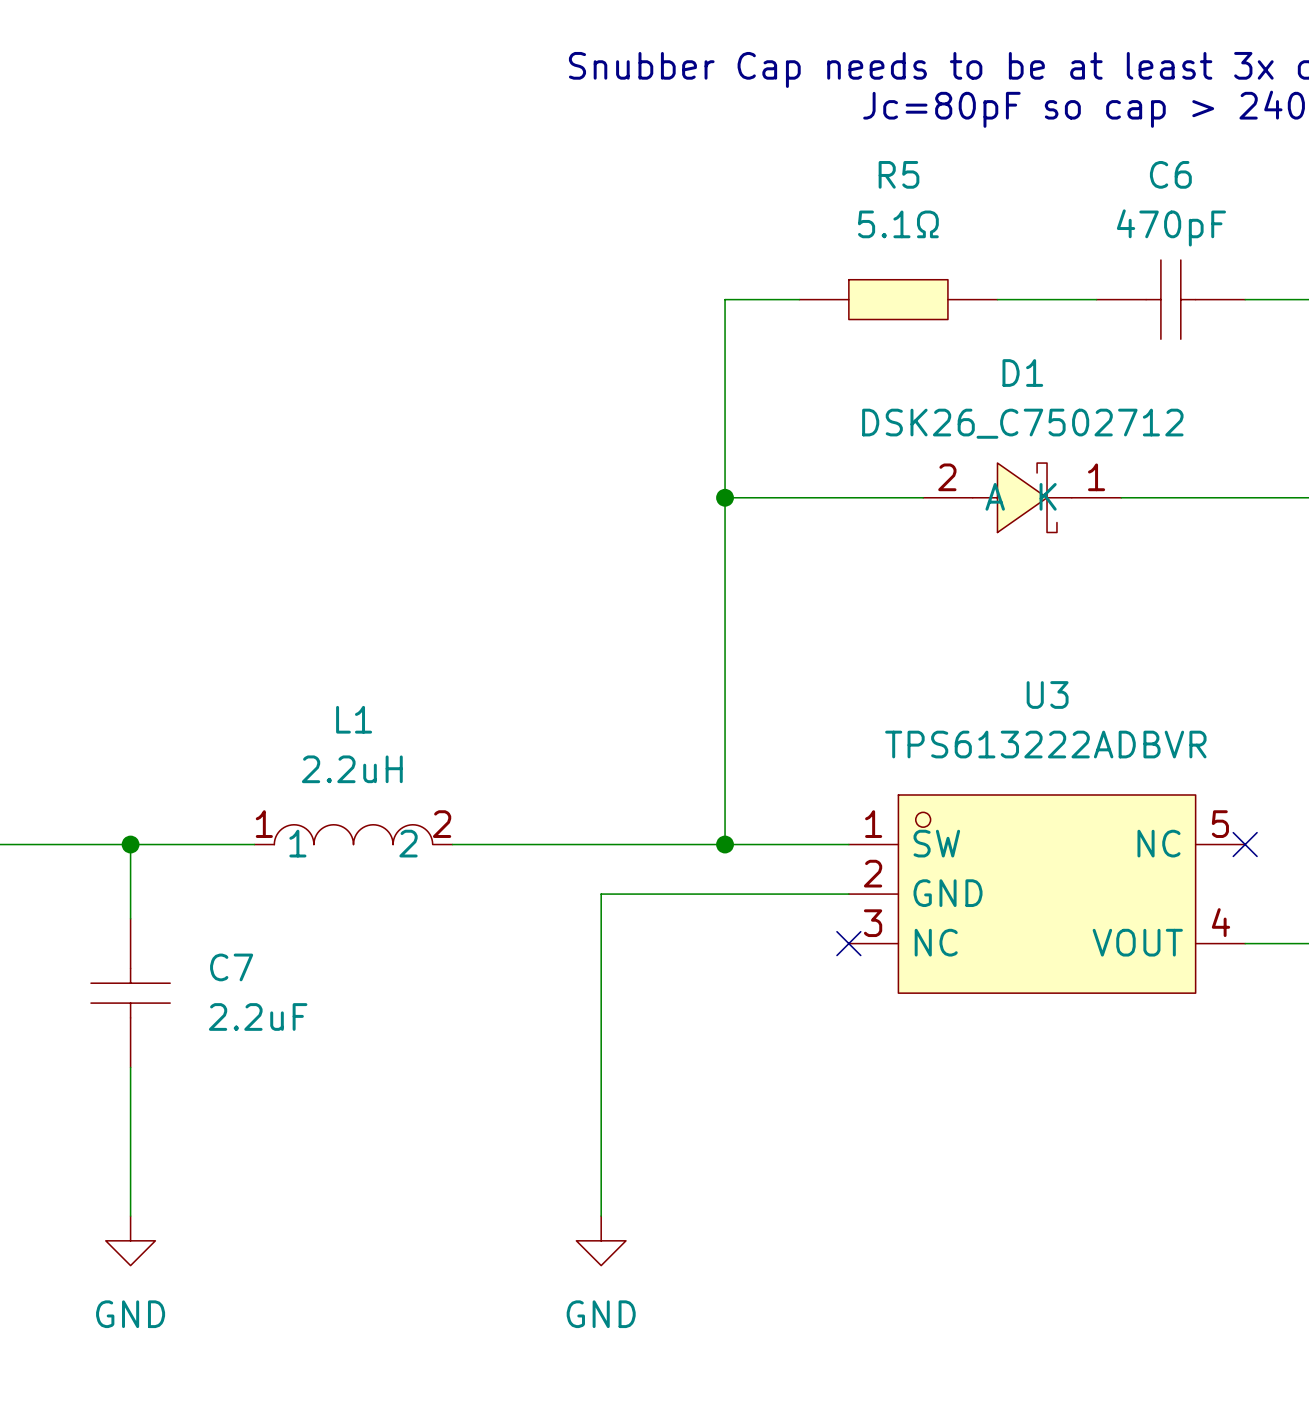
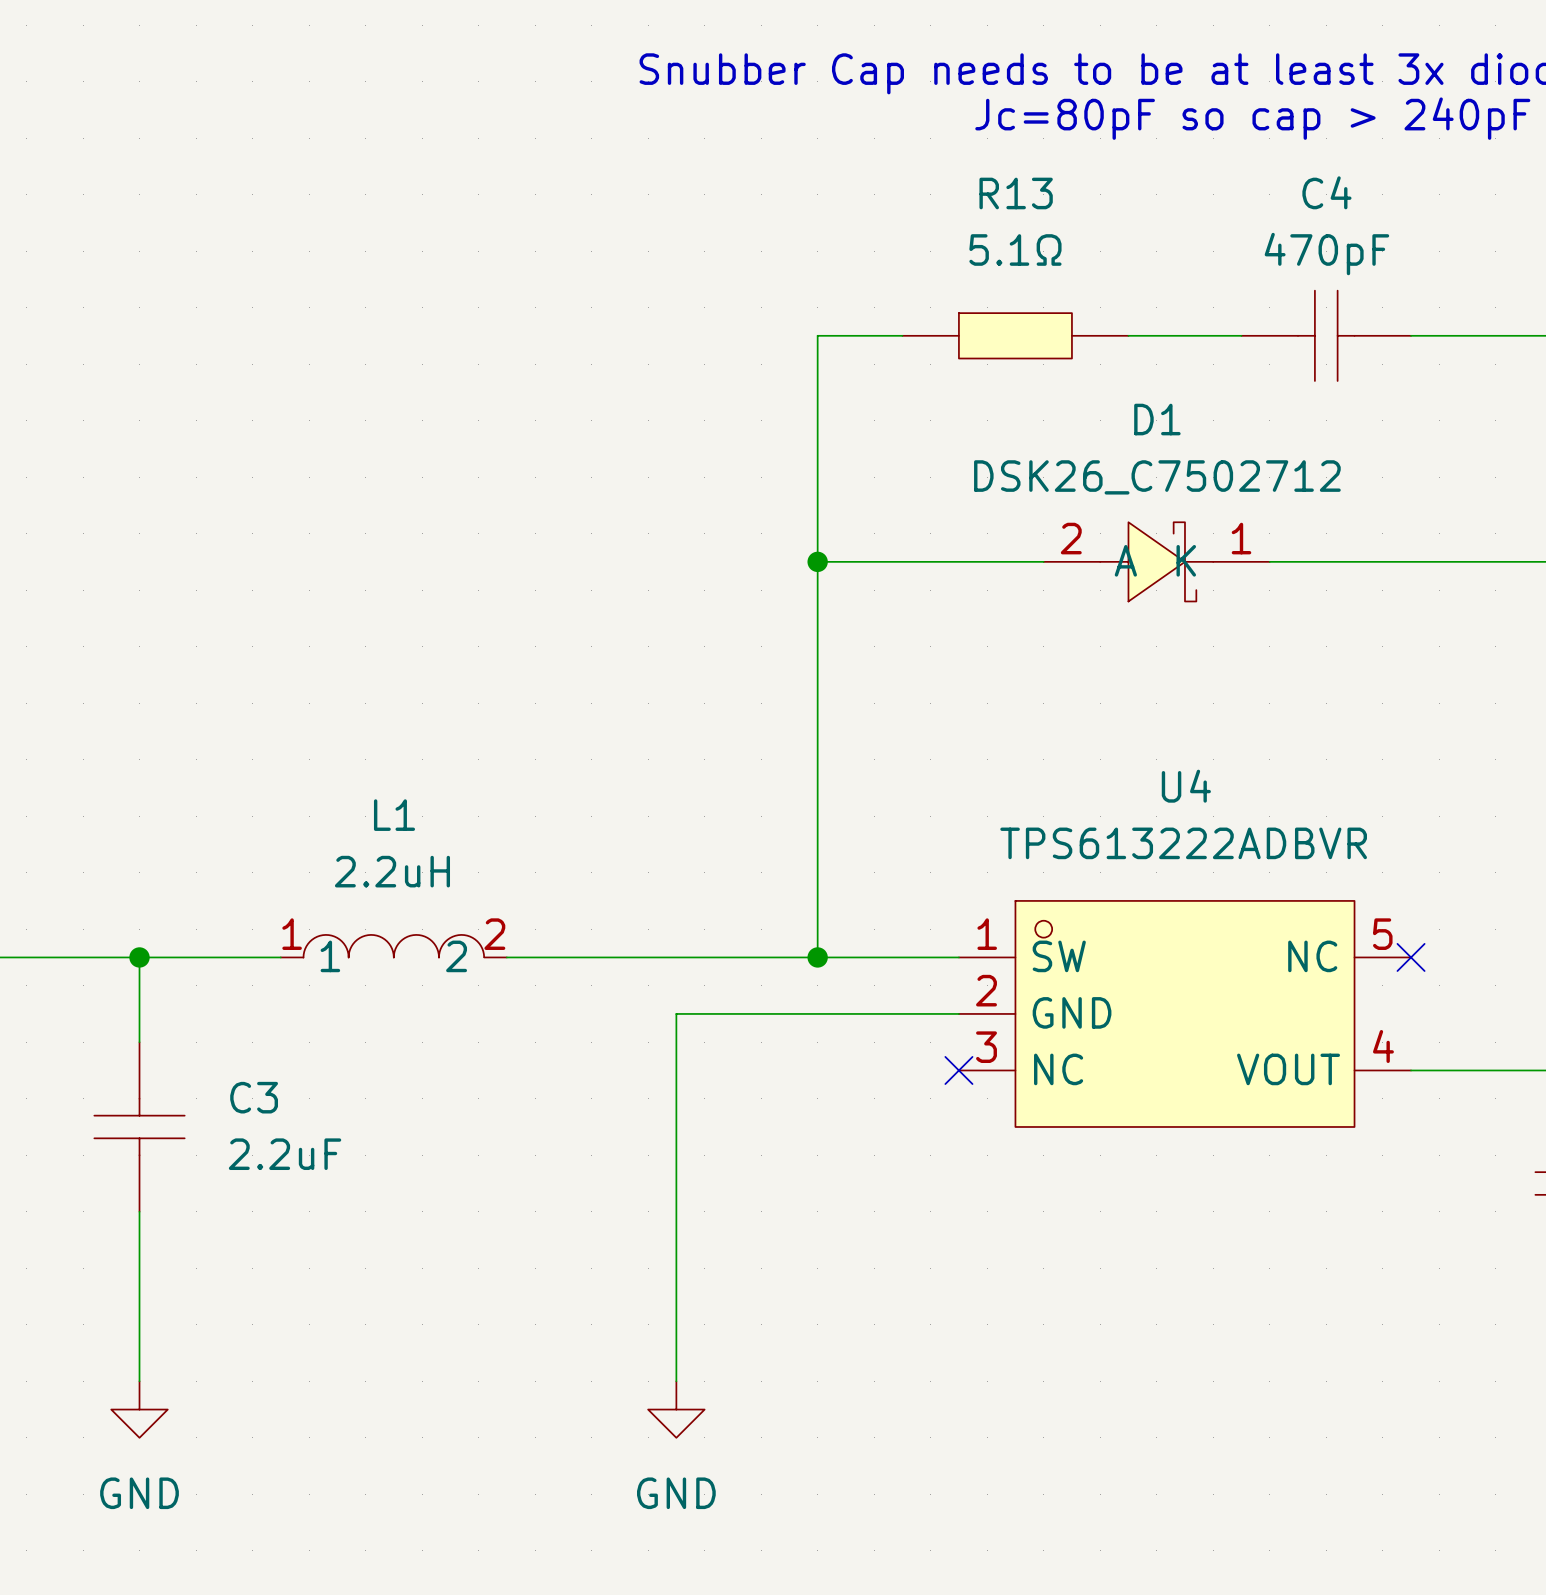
R5 name: R5 (899, 174) -> R13 (1016, 193)
C6 name: C6 (1170, 174) -> C4 (1326, 192)
U3 name: U3 (1047, 694) -> U4 (1186, 786)
C7 name: C7 (231, 967) -> C3 (254, 1097)

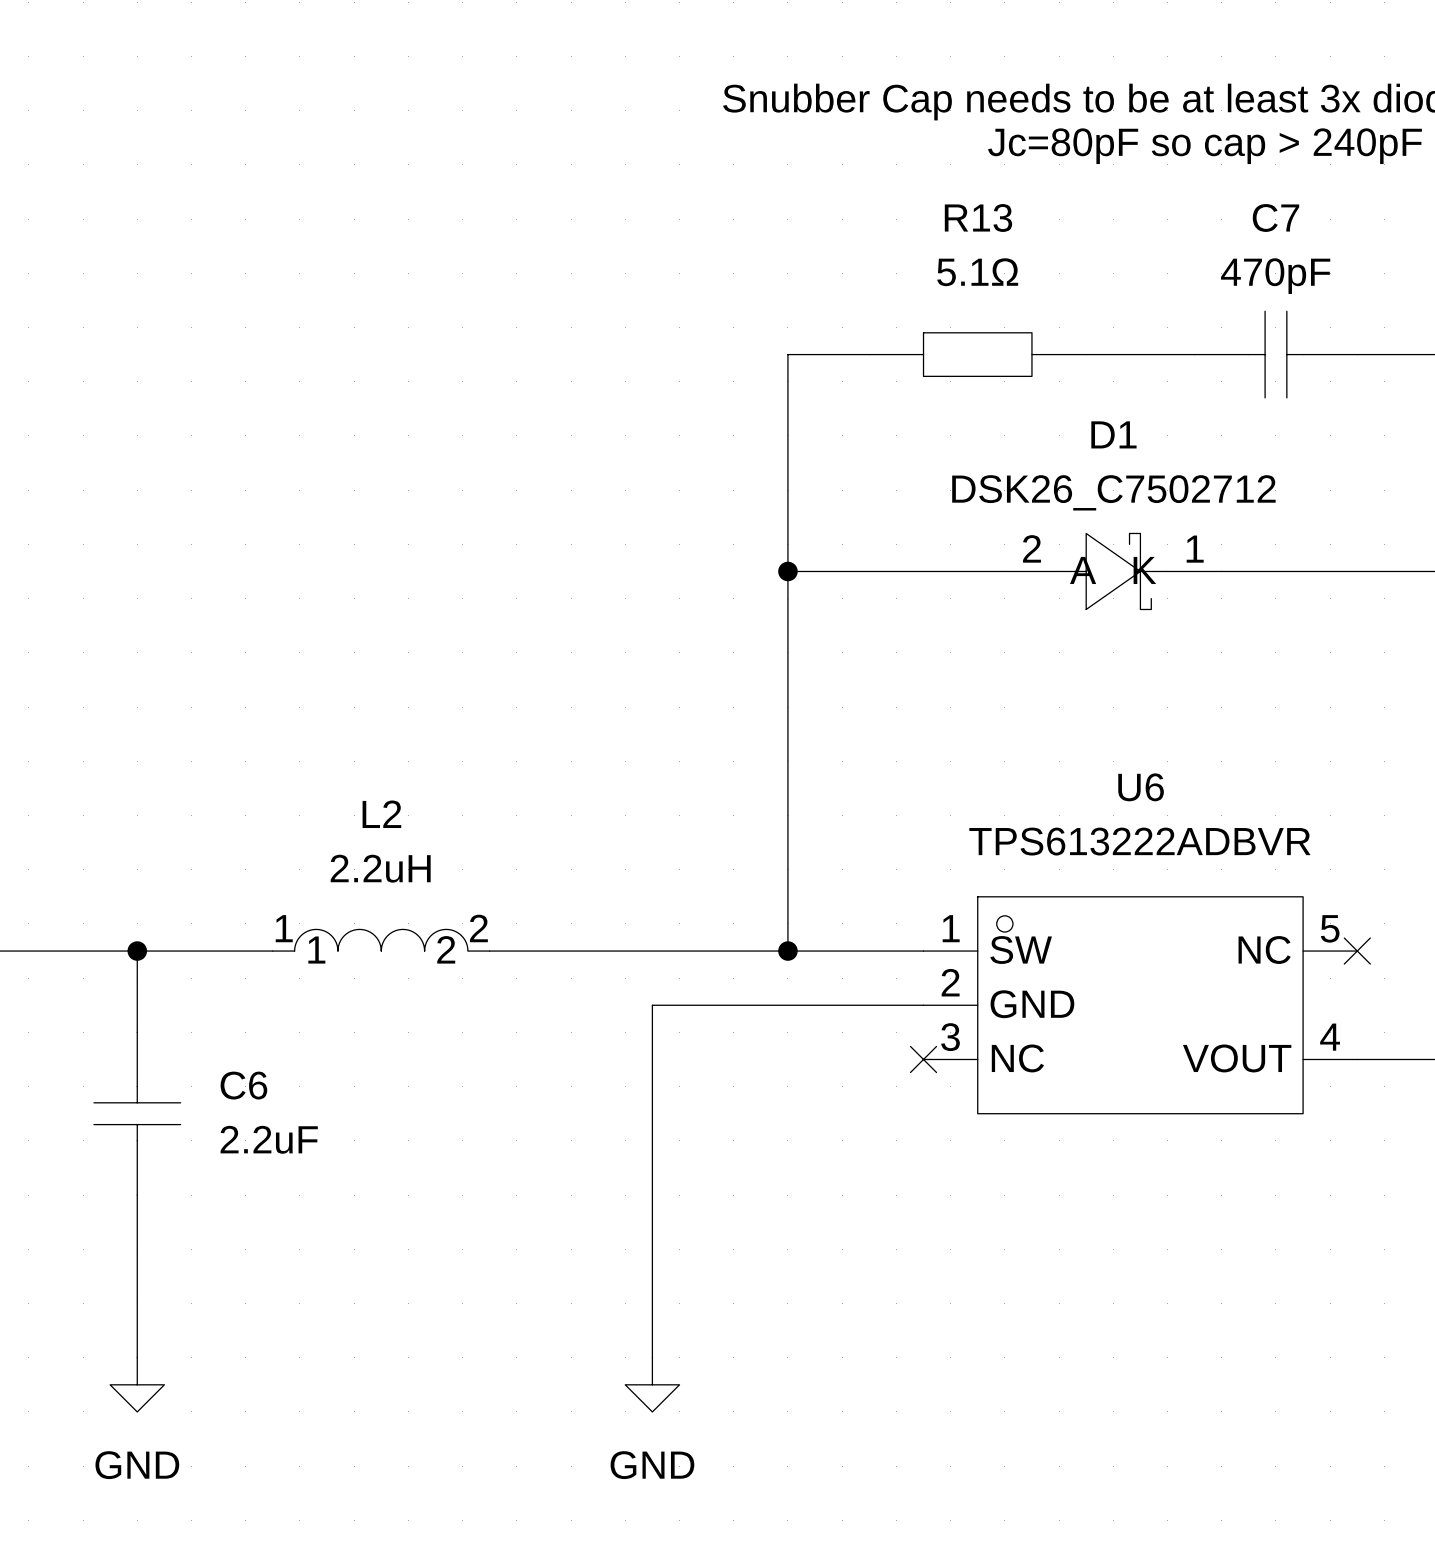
C4 name: C4 (1326, 192) -> C7 (1275, 218)
U4 name: U4 (1186, 786) -> U6 (1141, 787)
L1 name: L1 (394, 815) -> L2 (381, 814)
C3 name: C3 (254, 1097) -> C6 (243, 1085)

